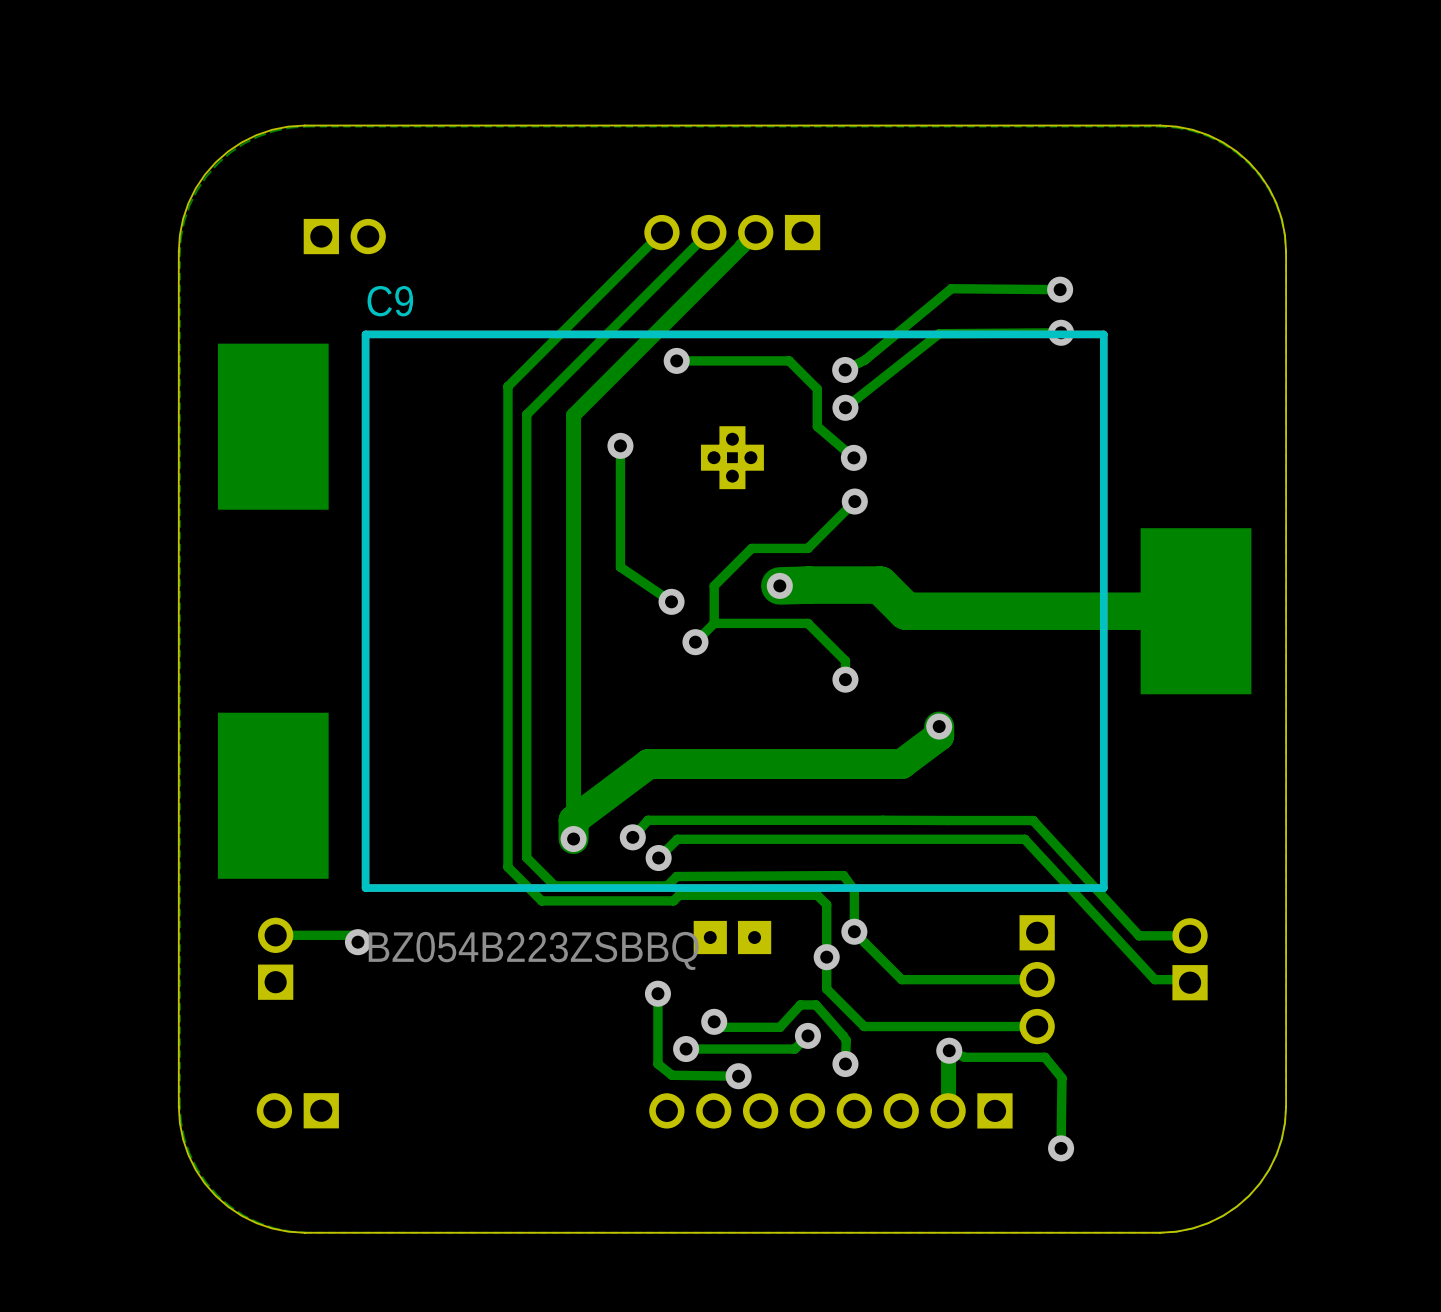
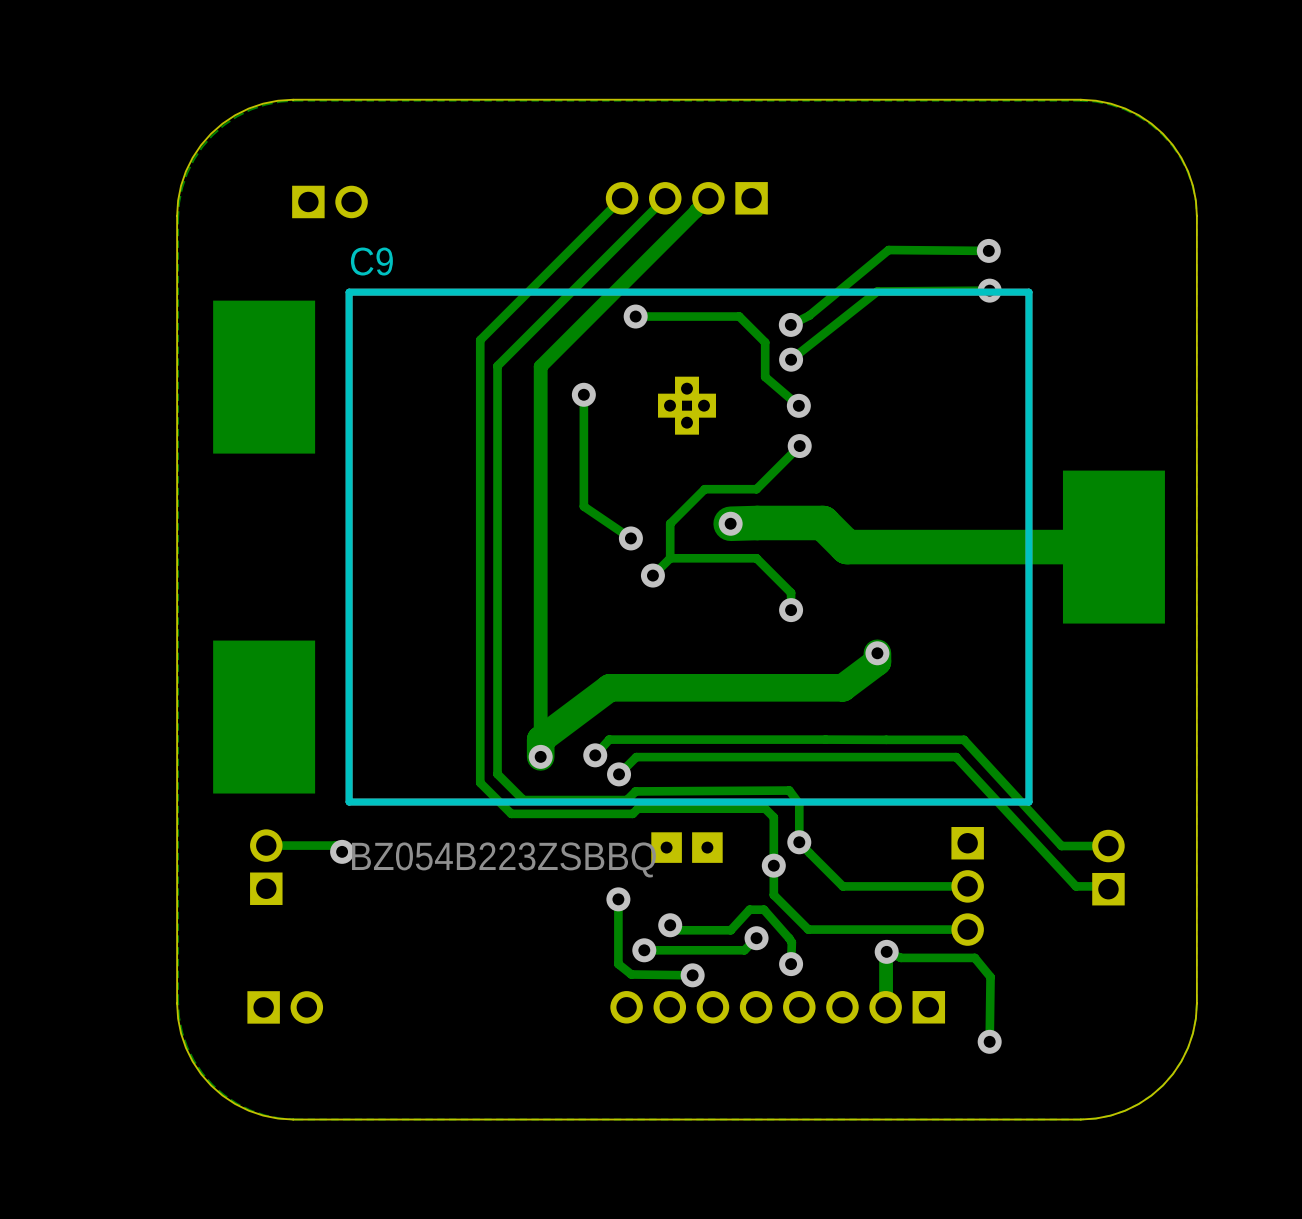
part rotation: 0° (297, 1110) -> 180° (285, 1007)

